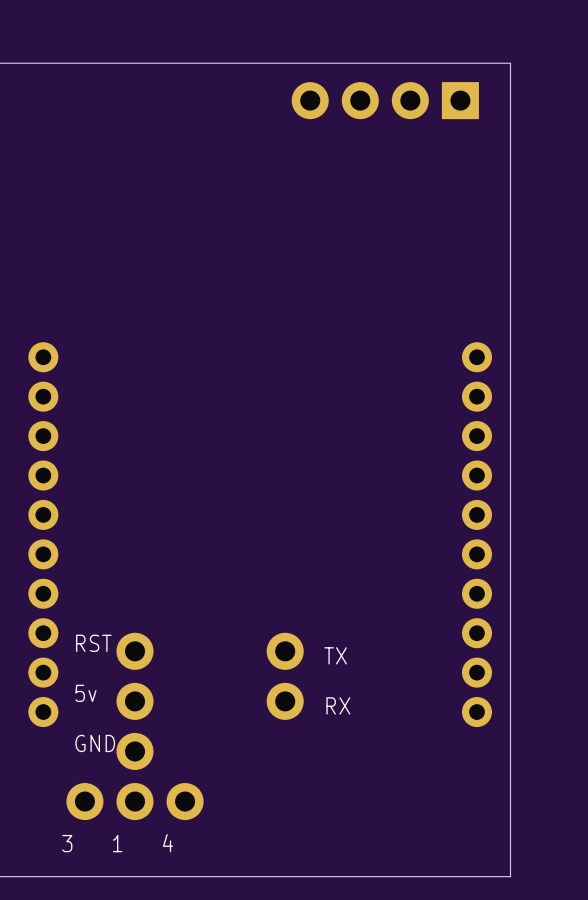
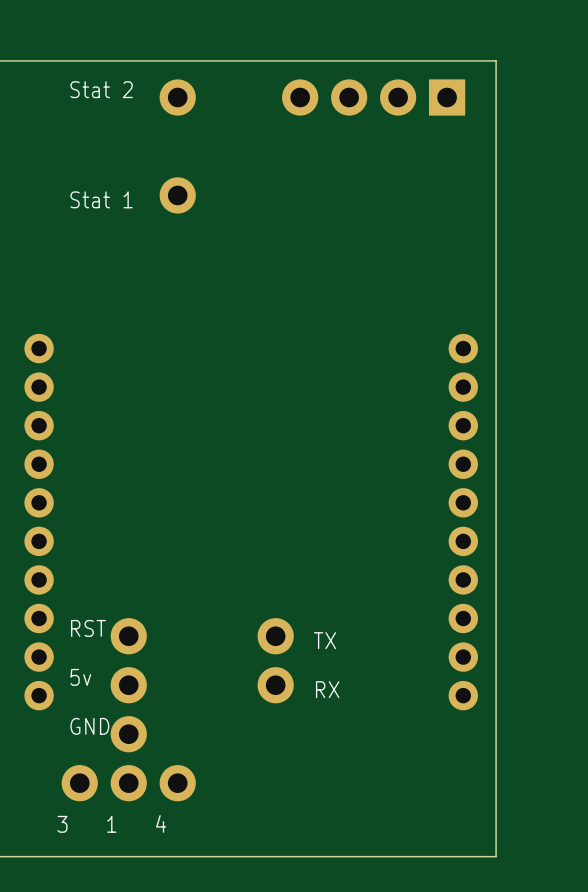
text: none -> Stat 2 (101, 89)
part: none -> (177, 97)
part: none -> (177, 195)
text: none -> Stat 1 (101, 199)

